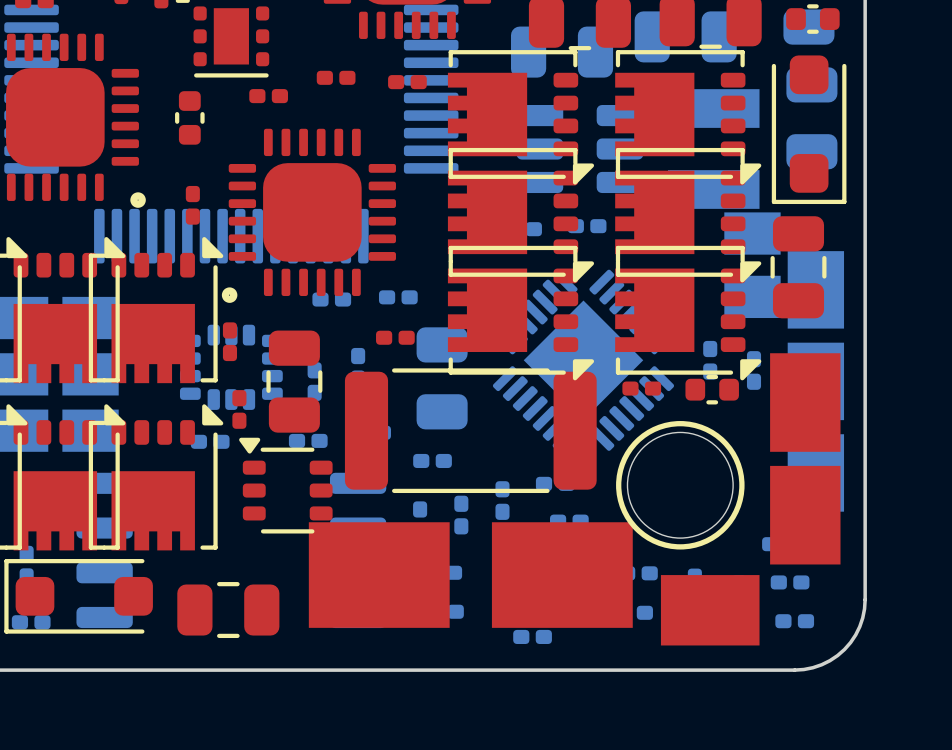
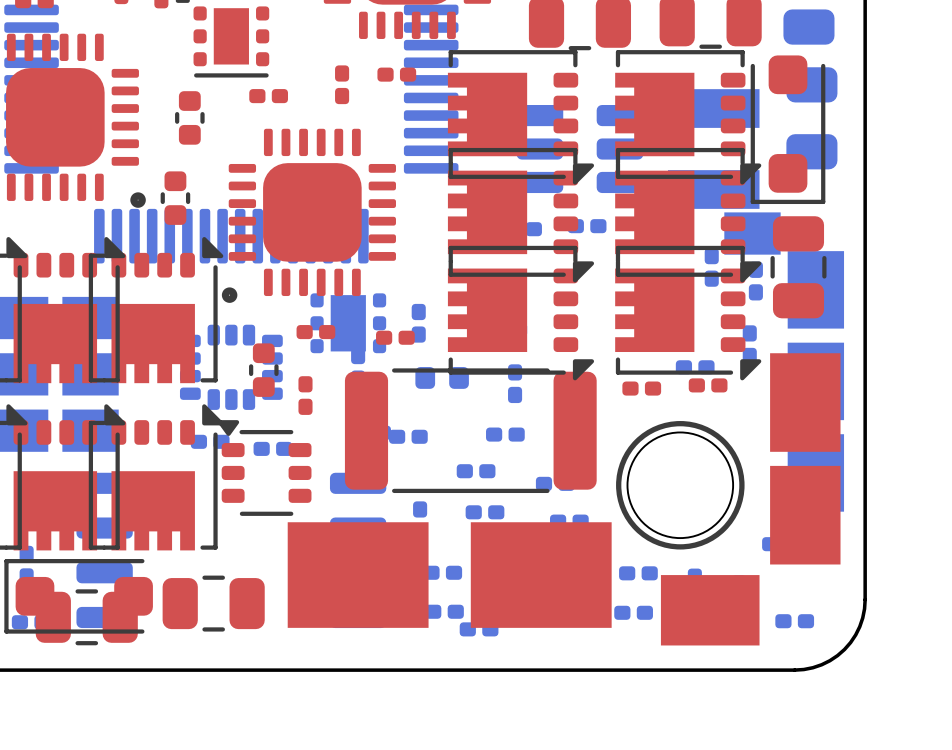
part: (812, 19) -> none
part: (685, 36) -> none
part: (562, 52) -> none
part rotation: 0° (336, 77) -> 90° clockwise (342, 84)
part position: (407, 82) -> (396, 74)
part position: (809, 129) -> (788, 129)
part footprint: [185, 185, 200, 225] -> [160, 171, 191, 225]
part: none -> (711, 267)
part footprint: [724, 275, 781, 319] -> [748, 261, 763, 301]
part rotation: 0° (398, 297) -> 90° clockwise (418, 323)
part position: (398, 297) -> (418, 323)
part: (331, 299) -> none
part: none -> (348, 323)
part footprint: [416, 327, 468, 430] -> [415, 367, 469, 389]
part: none -> (315, 332)
part: (229, 341) -> none
part: none -> (749, 344)
part: (583, 360) -> none
part rotation: 0° (710, 360) -> 90° clockwise (695, 367)
part: none -> (263, 370)
part: (754, 370) -> none
part footprint: [685, 374, 739, 405] -> [688, 378, 728, 393]
part: (294, 381) -> none
part: (314, 381) -> none
part: none -> (515, 383)
part: none -> (305, 395)
part: (239, 409) -> none
part: none -> (505, 434)
part: none -> (408, 436)
part position: (308, 440) -> (272, 448)
part: (432, 460) -> none
part: none -> (476, 471)
part position: (285, 485) -> (264, 468)
part: (502, 500) -> none
part: none -> (484, 512)
part: (461, 515) -> none
part position: (379, 575) -> (358, 575)
part position: (562, 575) -> (541, 575)
part: (790, 582) -> none
part position: (228, 610) -> (213, 603)
part: none -> (86, 617)
part: none -> (479, 629)
part: (532, 636) -> none

